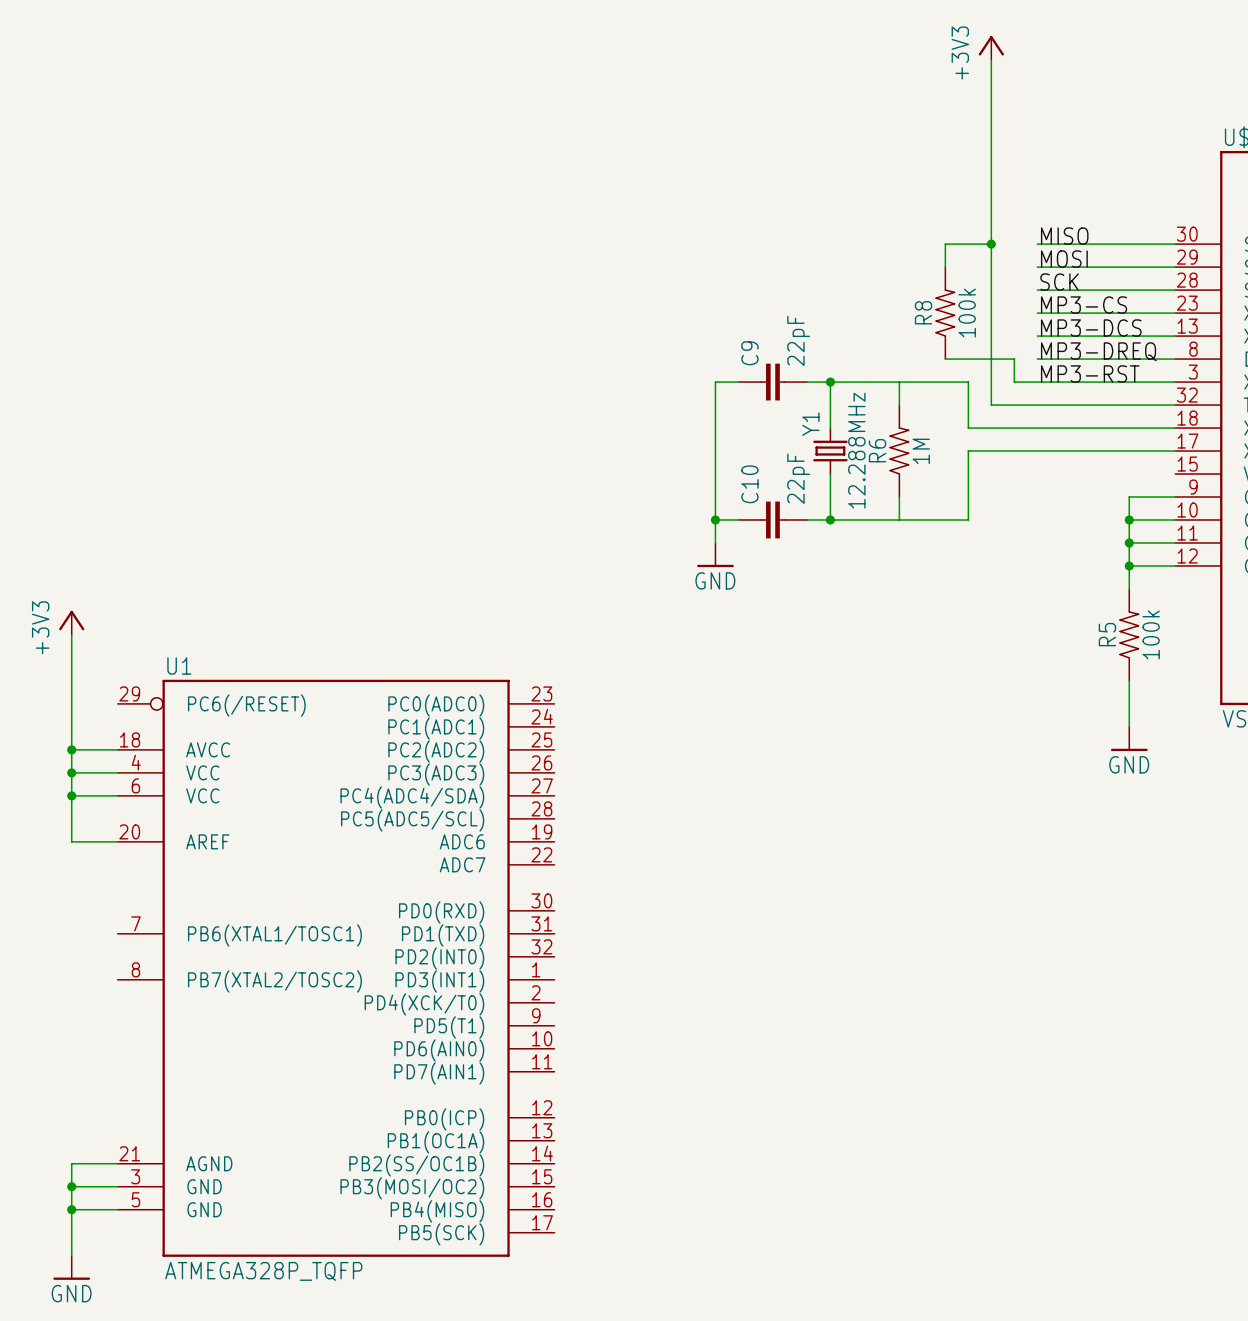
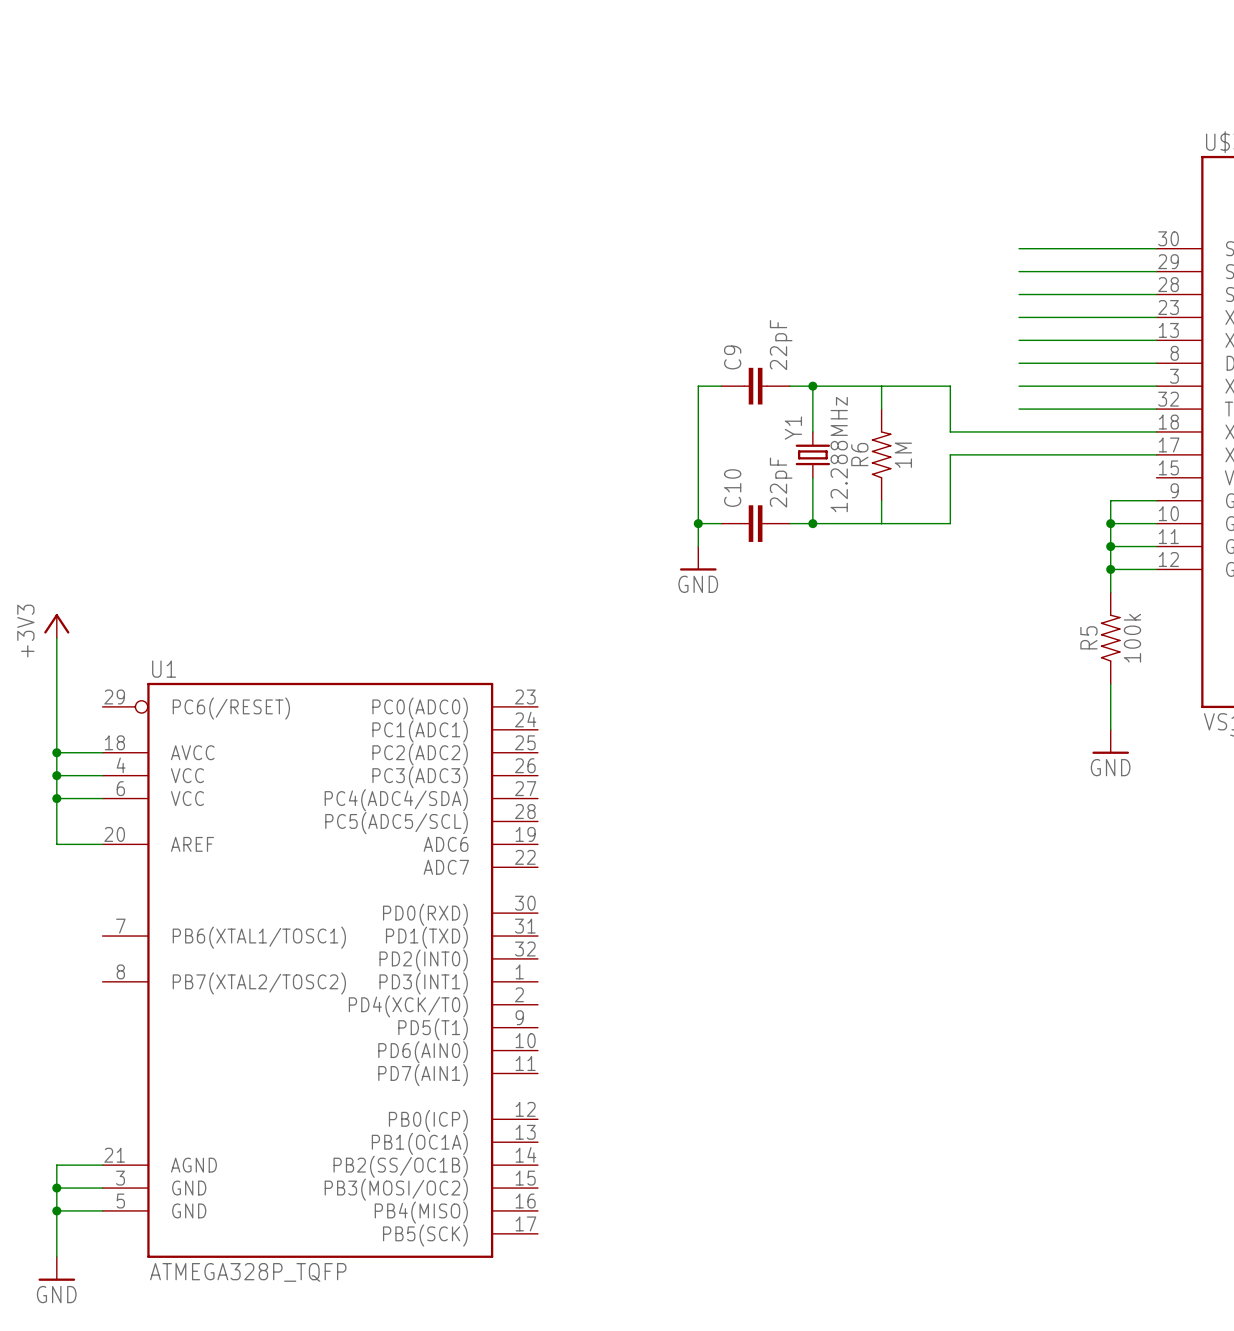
power symbol: +3V3 (991, 48) -> none
wire: (991, 60) (991, 405) (1037, 405) -> none
label: MISO (1064, 236) -> none
wire: (991, 244) (945, 244) (945, 267) -> none
junction: (991, 244) -> none
label: MOSI (1064, 259) -> none
label: SCK (1059, 282) -> none
label: MP3-CS (1084, 305) -> none
R8: 100k (945, 313) -> none
label: MP3-DCS (1091, 328) -> none
label: MP3-DREQ (1098, 351) -> none
wire: (945, 359) (1014, 359) (1014, 382) (1037, 382) -> none
label: MP3-RST (1090, 374) -> none

